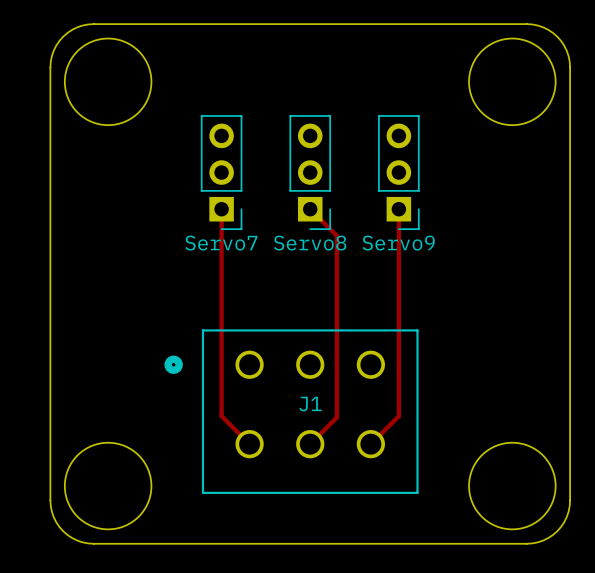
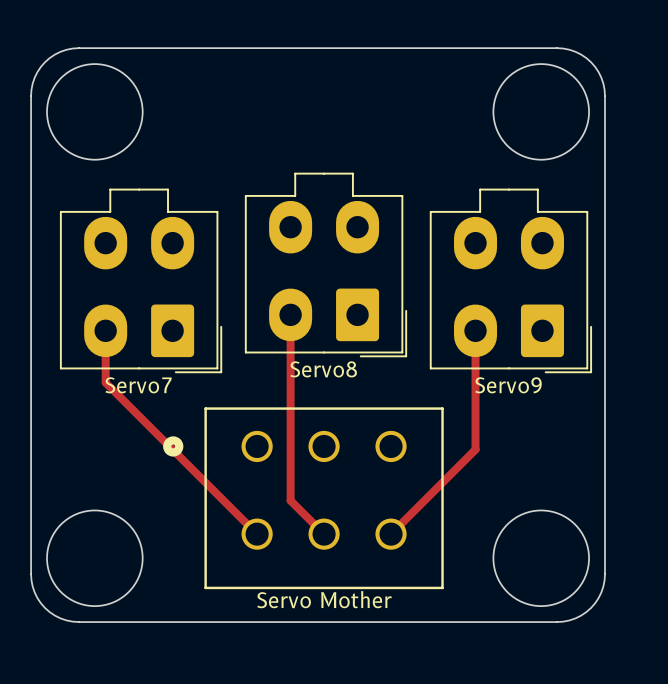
Servo7 footprint: [200, 115, 243, 231] -> [59, 188, 223, 374]
Servo8 footprint: [289, 115, 332, 231] -> [244, 172, 408, 358]
Servo9 footprint: [378, 115, 420, 231] -> [429, 188, 593, 374]
track: (221, 209) (221, 416) (249, 444) -> none
track: (310, 209) (336, 235) (336, 417) (310, 444) -> none
track: (398, 209) (398, 416) (370, 444) -> none
track: none -> (290, 314) (290, 500) (324, 534)
track: none -> (105, 330) (105, 382) (257, 534)
track: none -> (475, 330) (475, 449) (391, 534)
J1: (291, 411) -> none
Servo Mother: none -> (303, 498)

